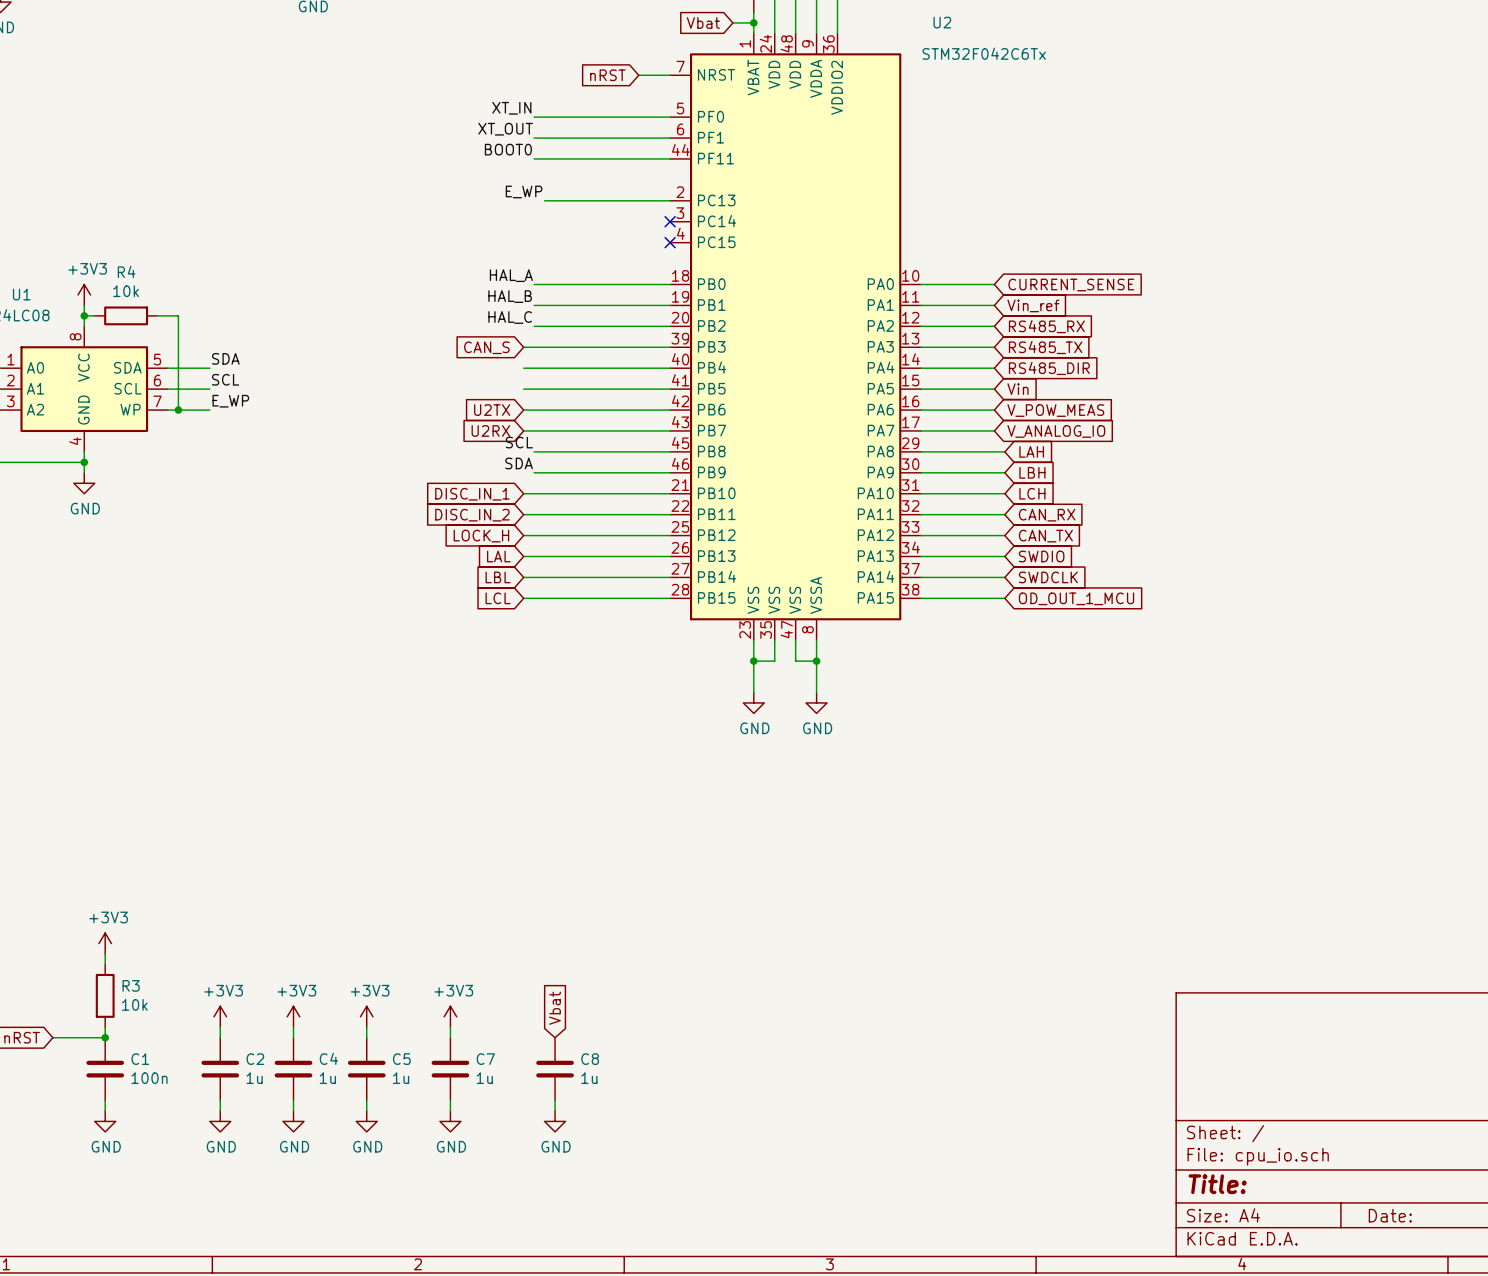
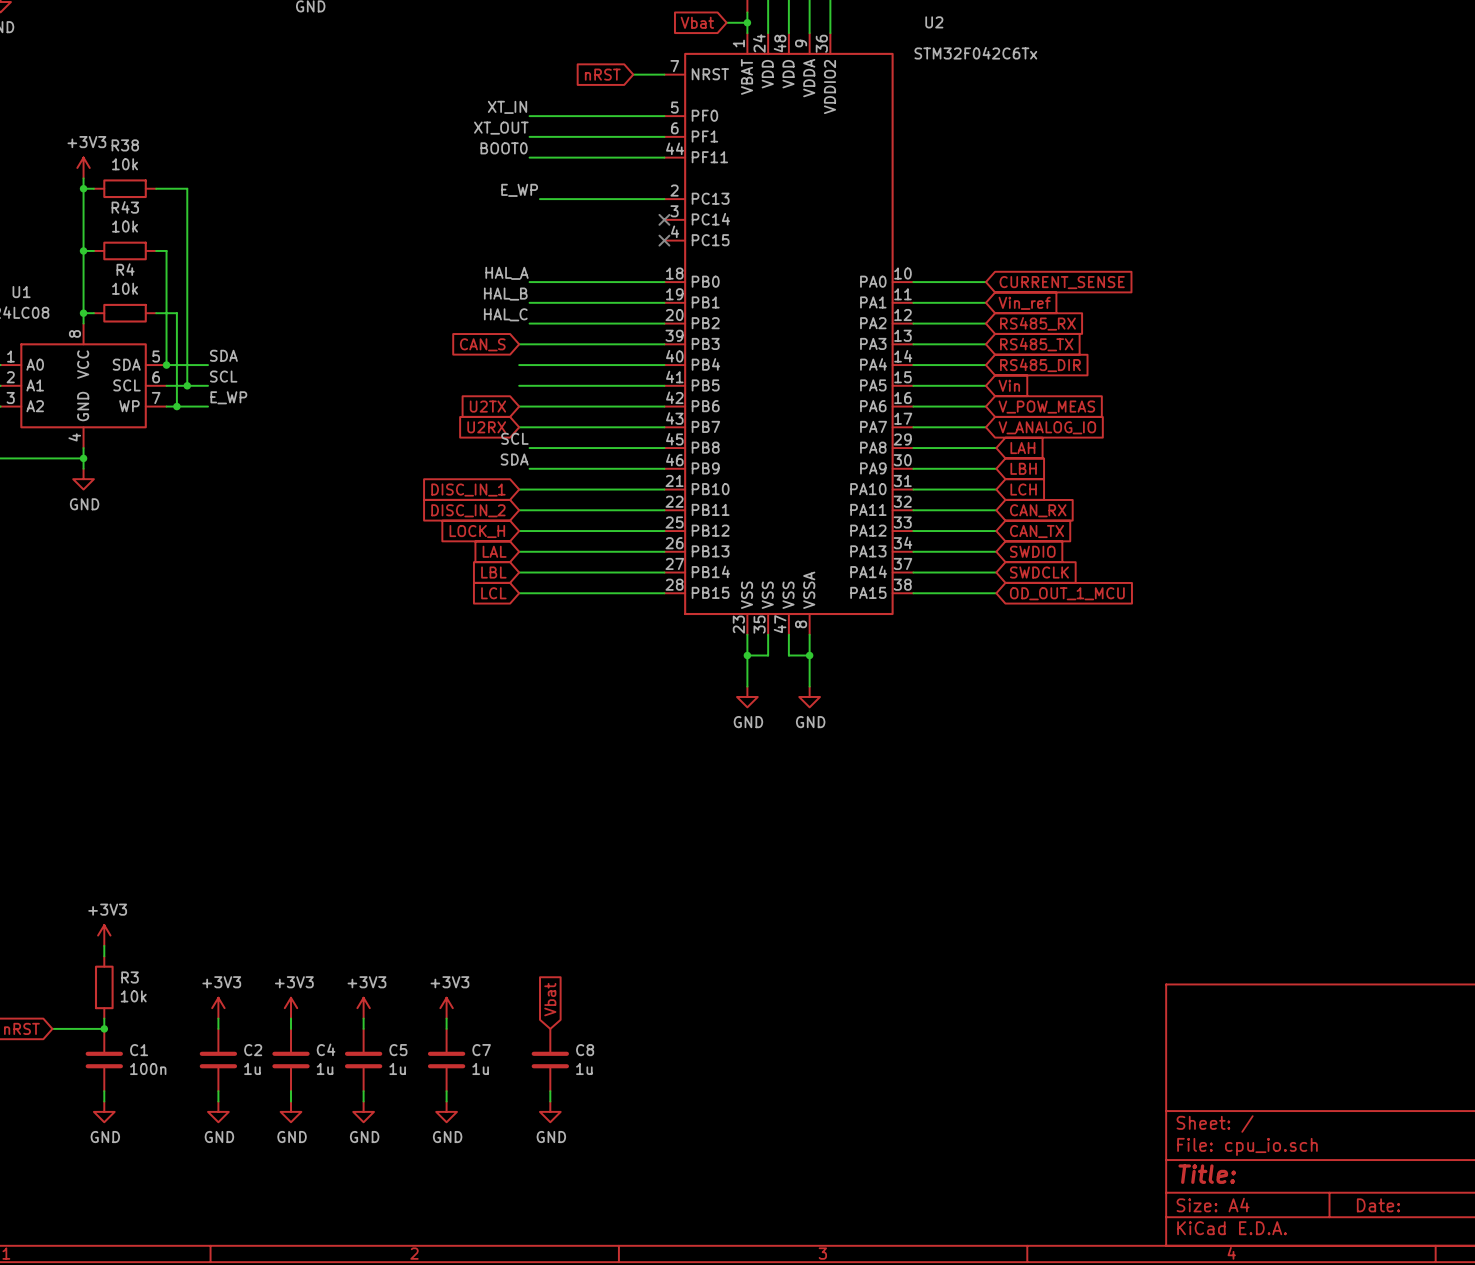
wire: none -> (83, 178) (83, 302)
wire: none -> (83, 188) (93, 188)
junction: none -> (83, 188)
R38: none -> 10k (125, 188)
wire: none -> (156, 188) (187, 188) (187, 385)
wire: none -> (83, 250) (93, 250)
junction: none -> (83, 250)
R43: none -> 10k (125, 250)
wire: none -> (156, 250) (166, 250) (166, 365)
power symbol position: +3V3 (84, 294) -> +3V3 (83, 167)
junction: none -> (166, 365)
junction: none -> (187, 385)

